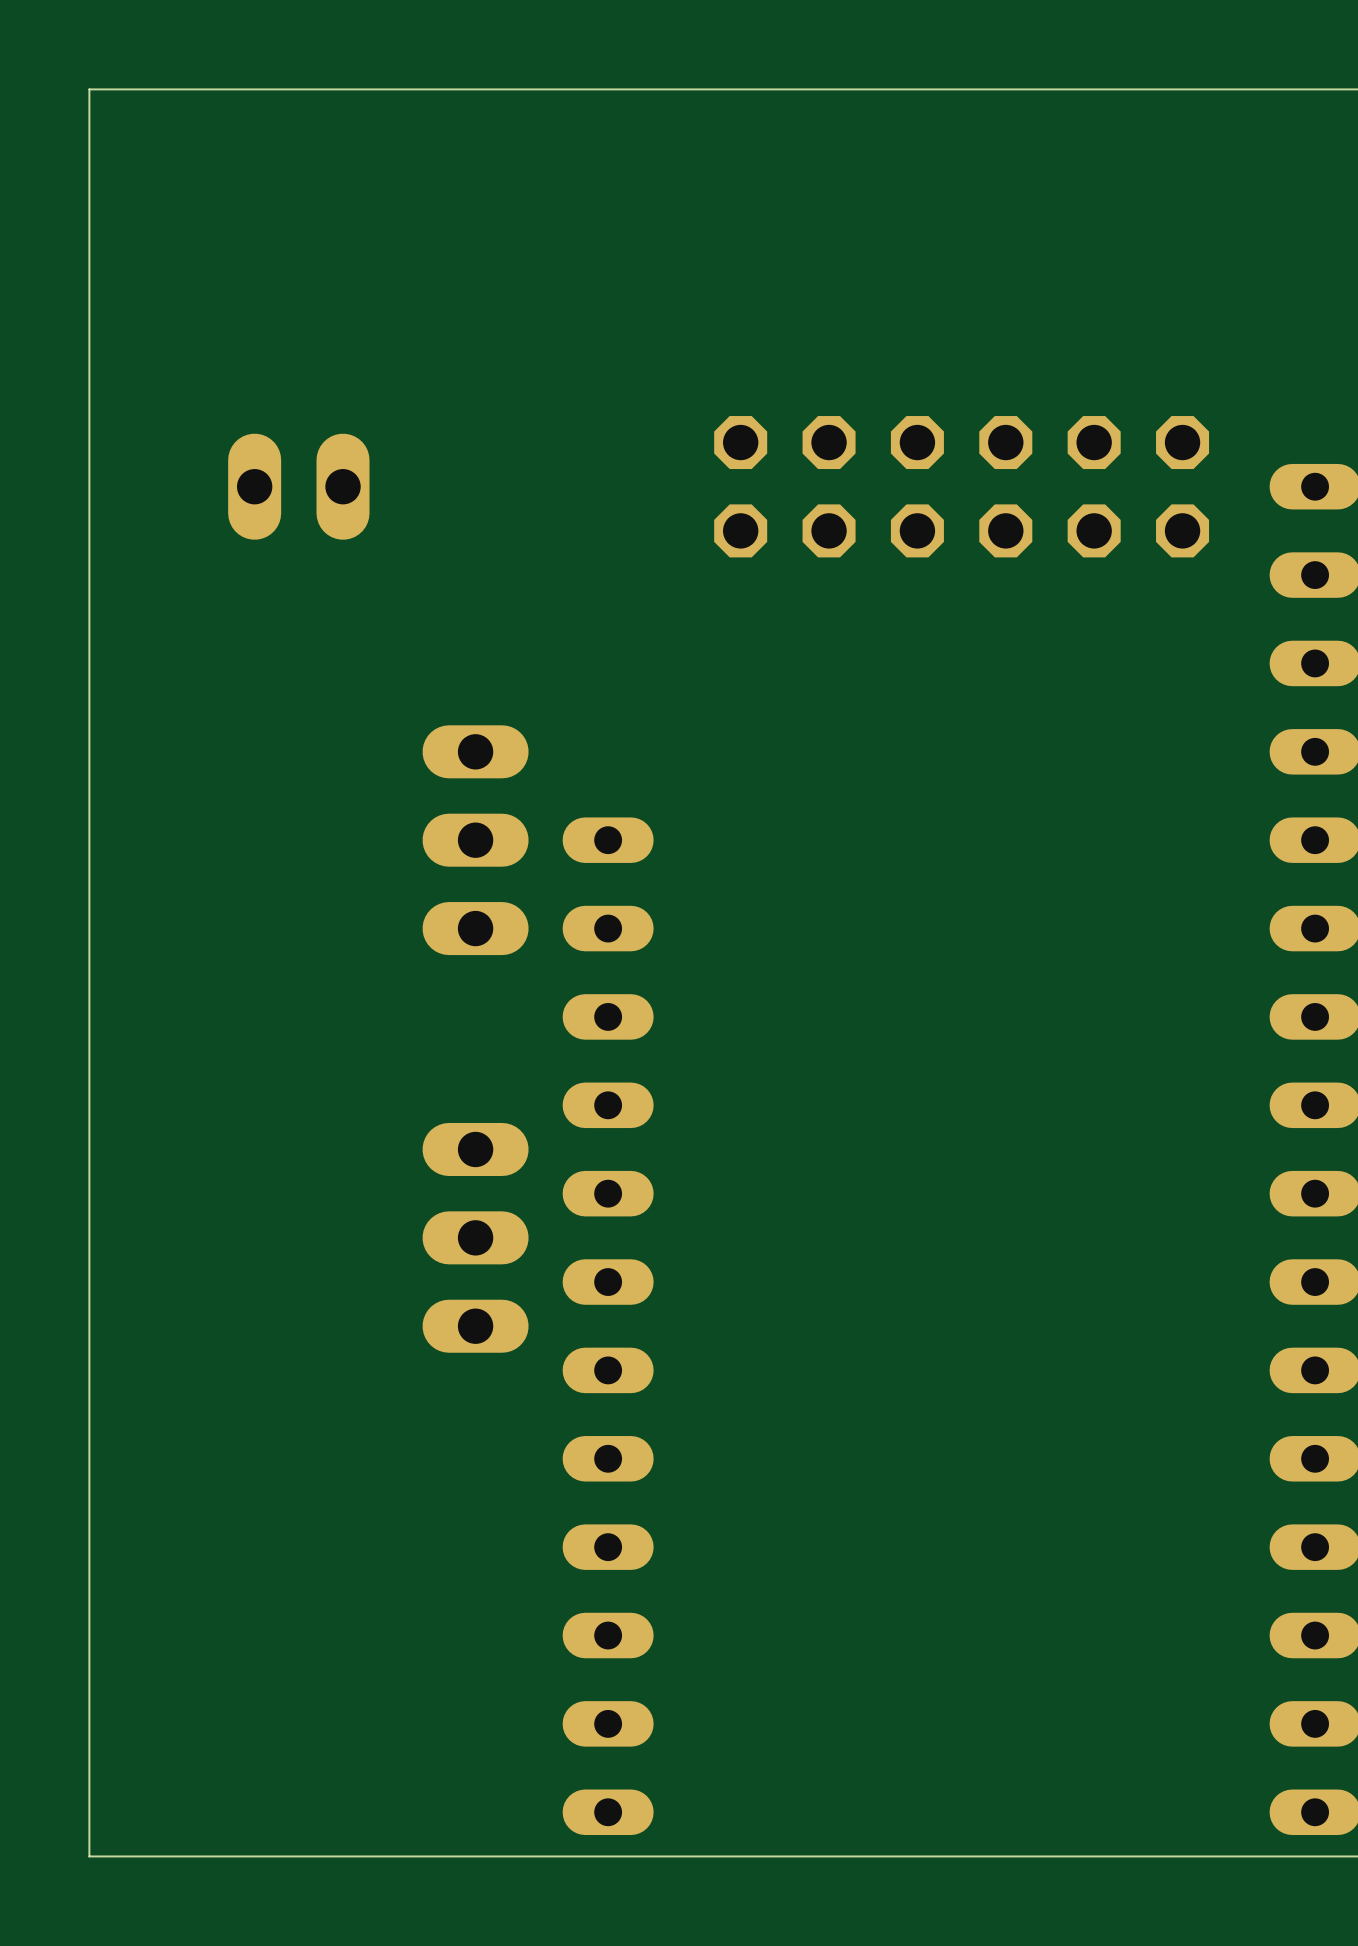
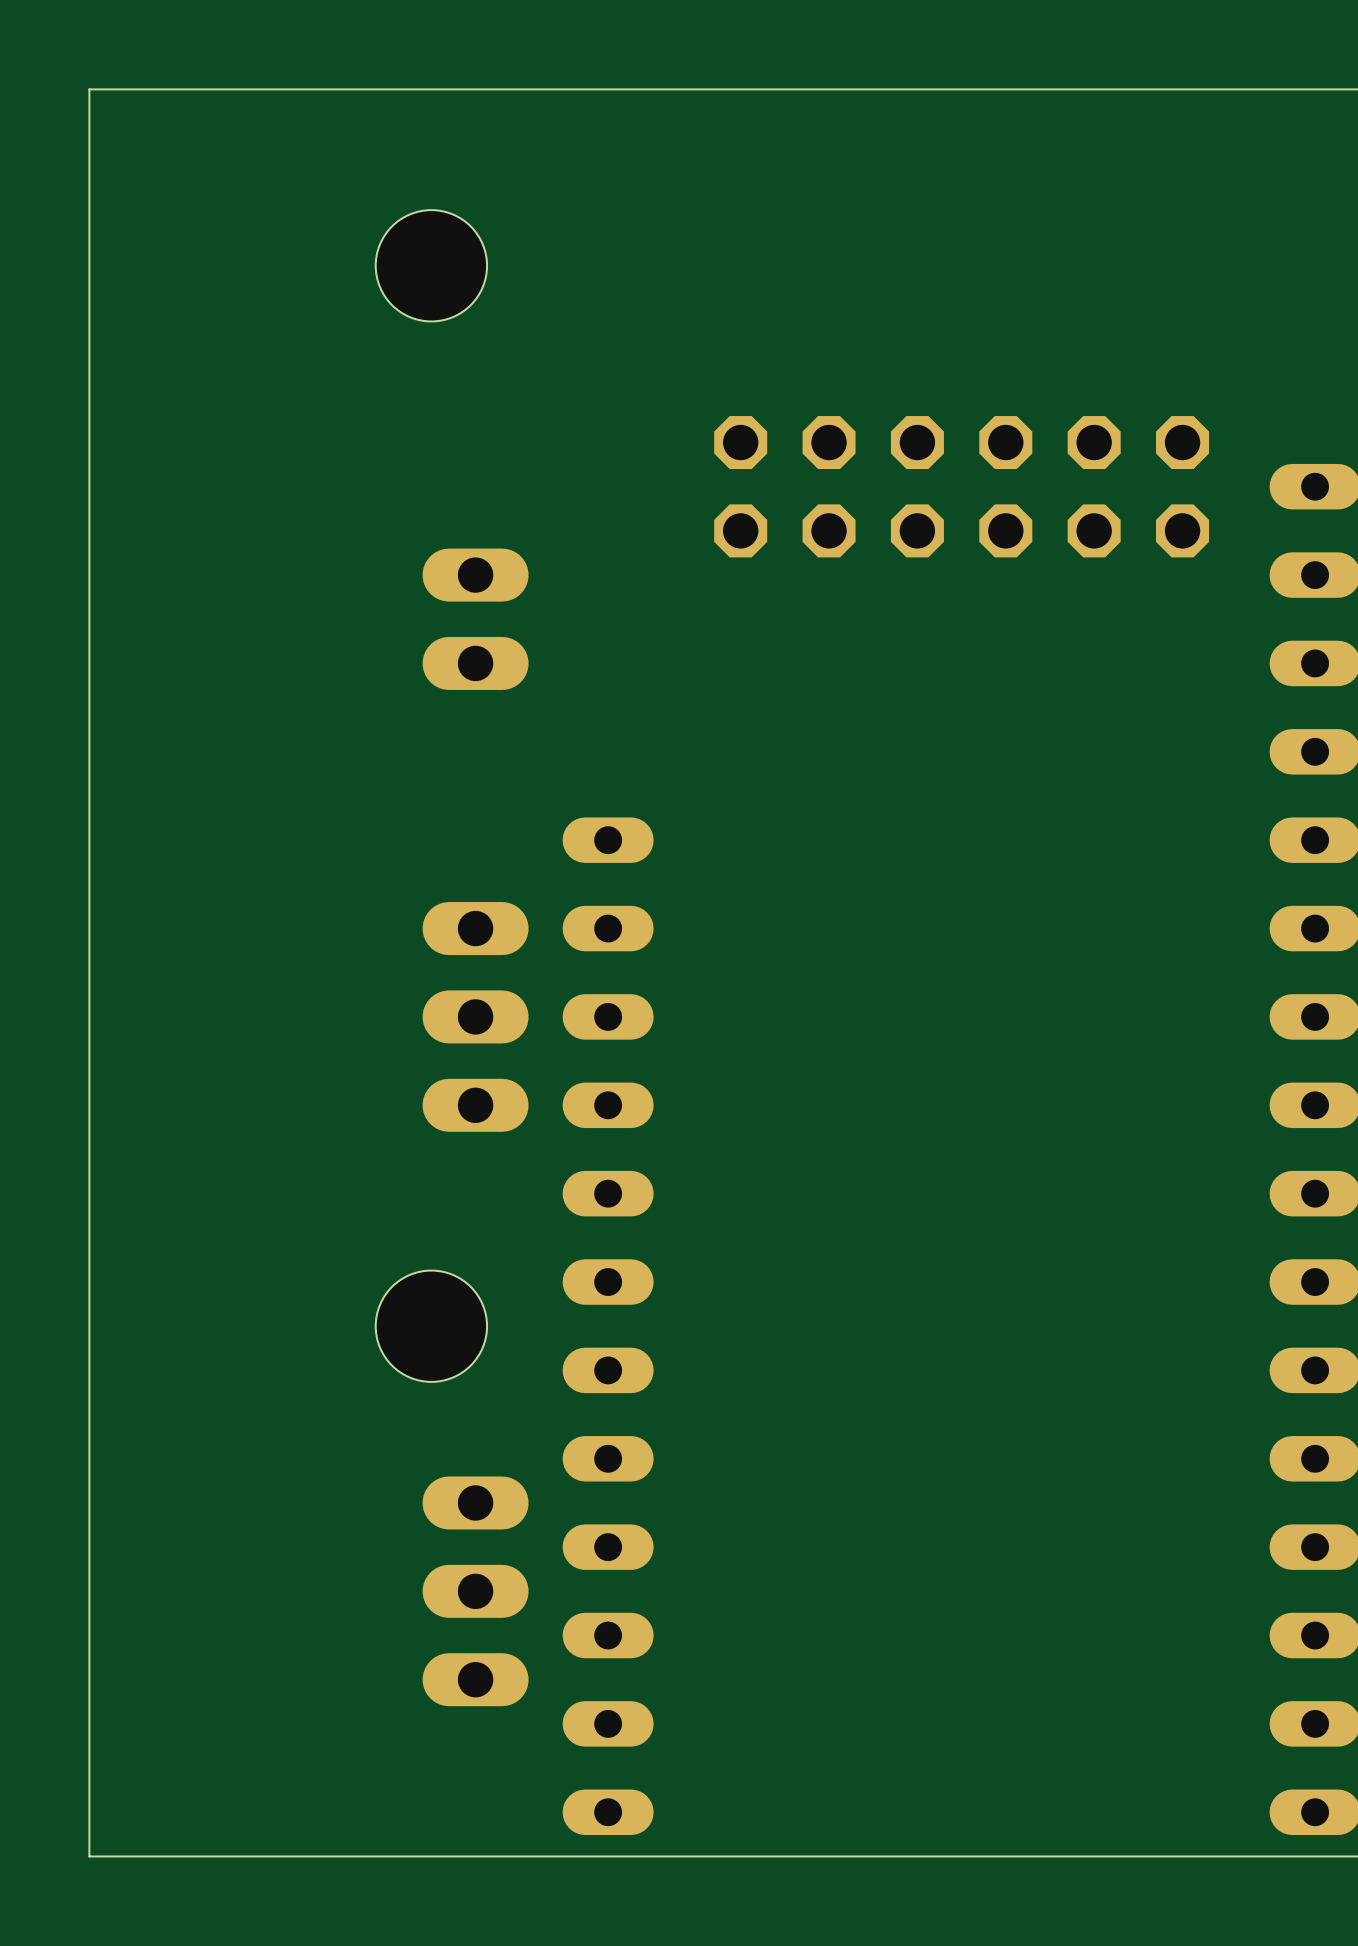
hole: none -> (431, 265)
part rotation: 0° (298, 486) -> 90° clockwise (475, 619)
part position: (298, 486) -> (475, 619)
part: (475, 840) -> none
part: none -> (475, 1016)
part: (475, 1237) -> none
hole: none -> (431, 1326)
part: none -> (475, 1591)

